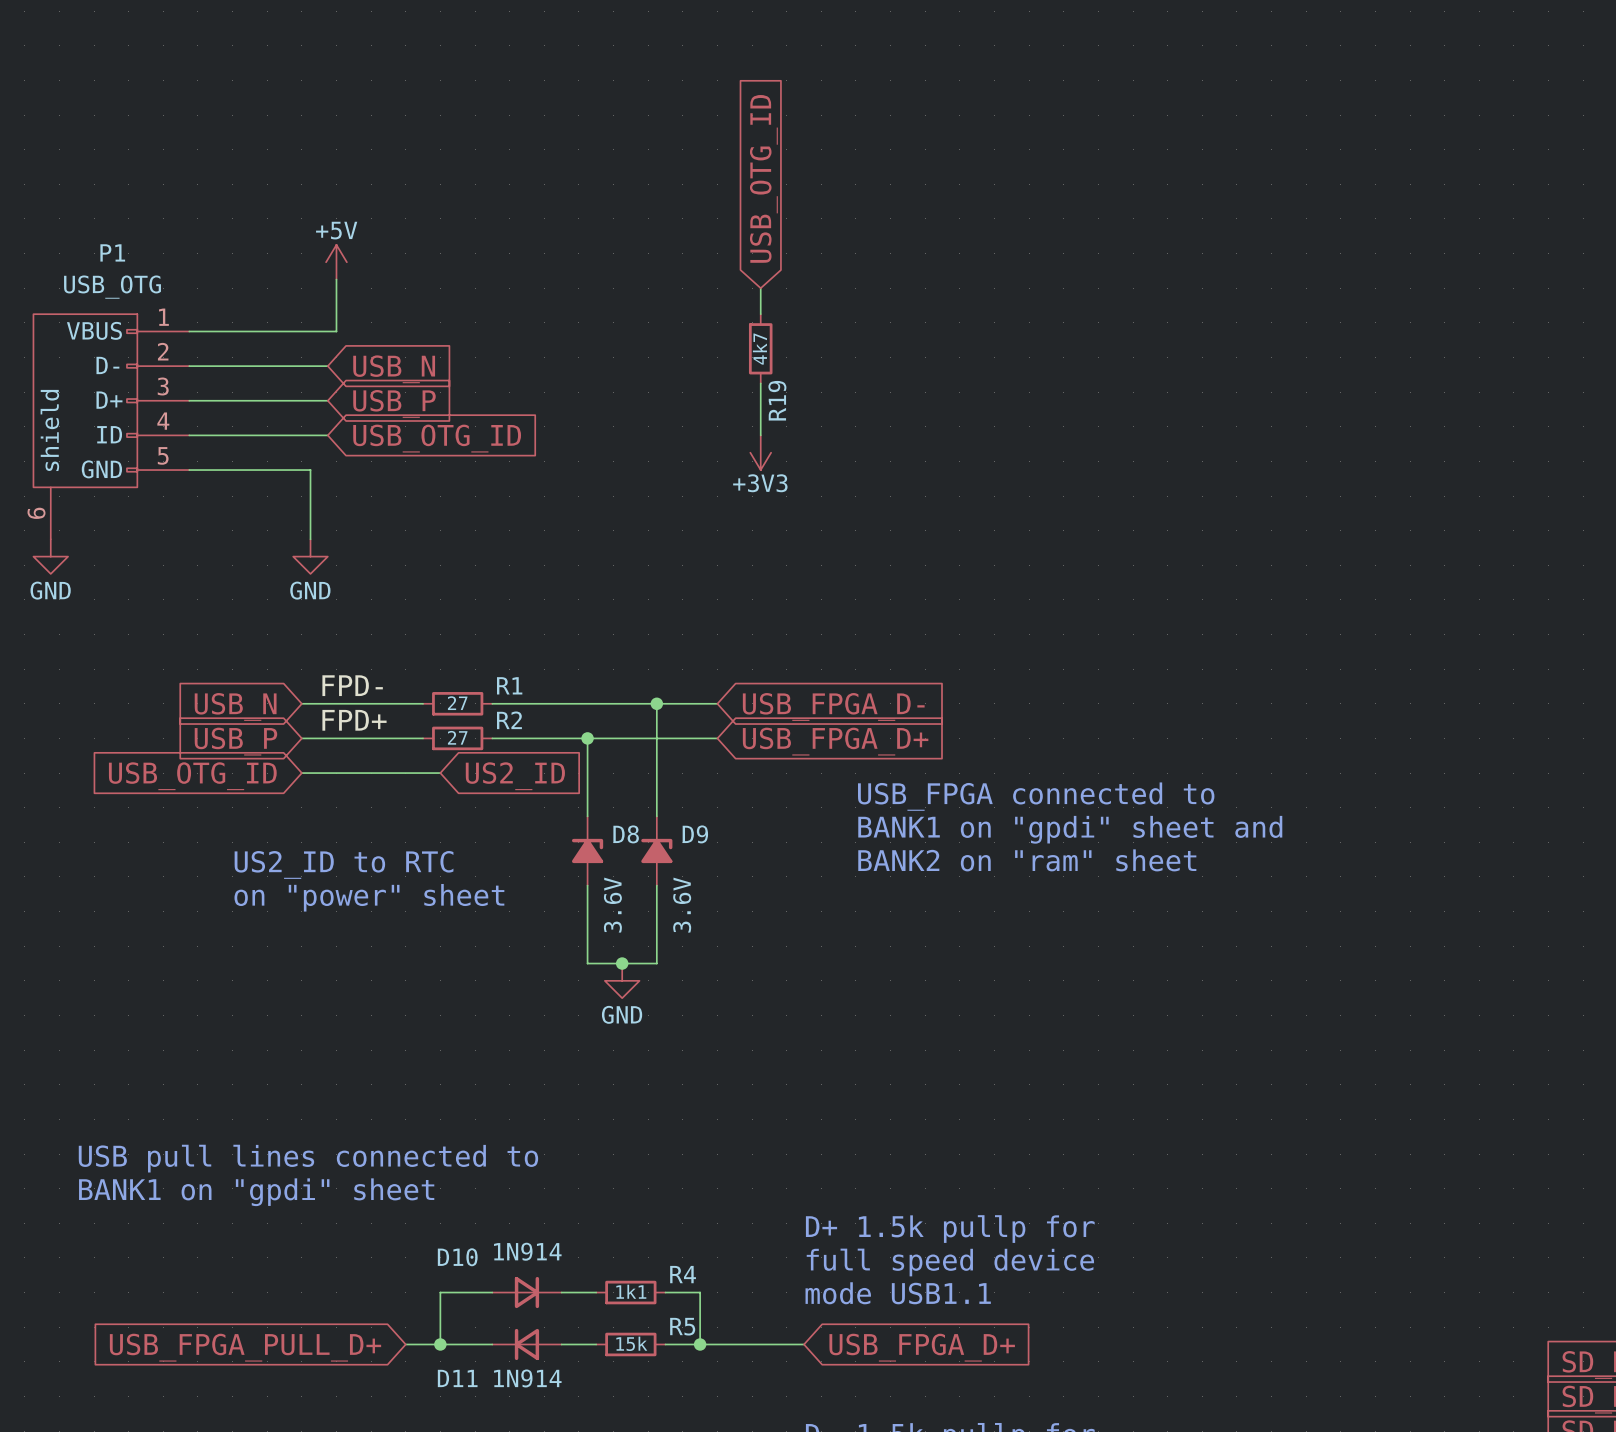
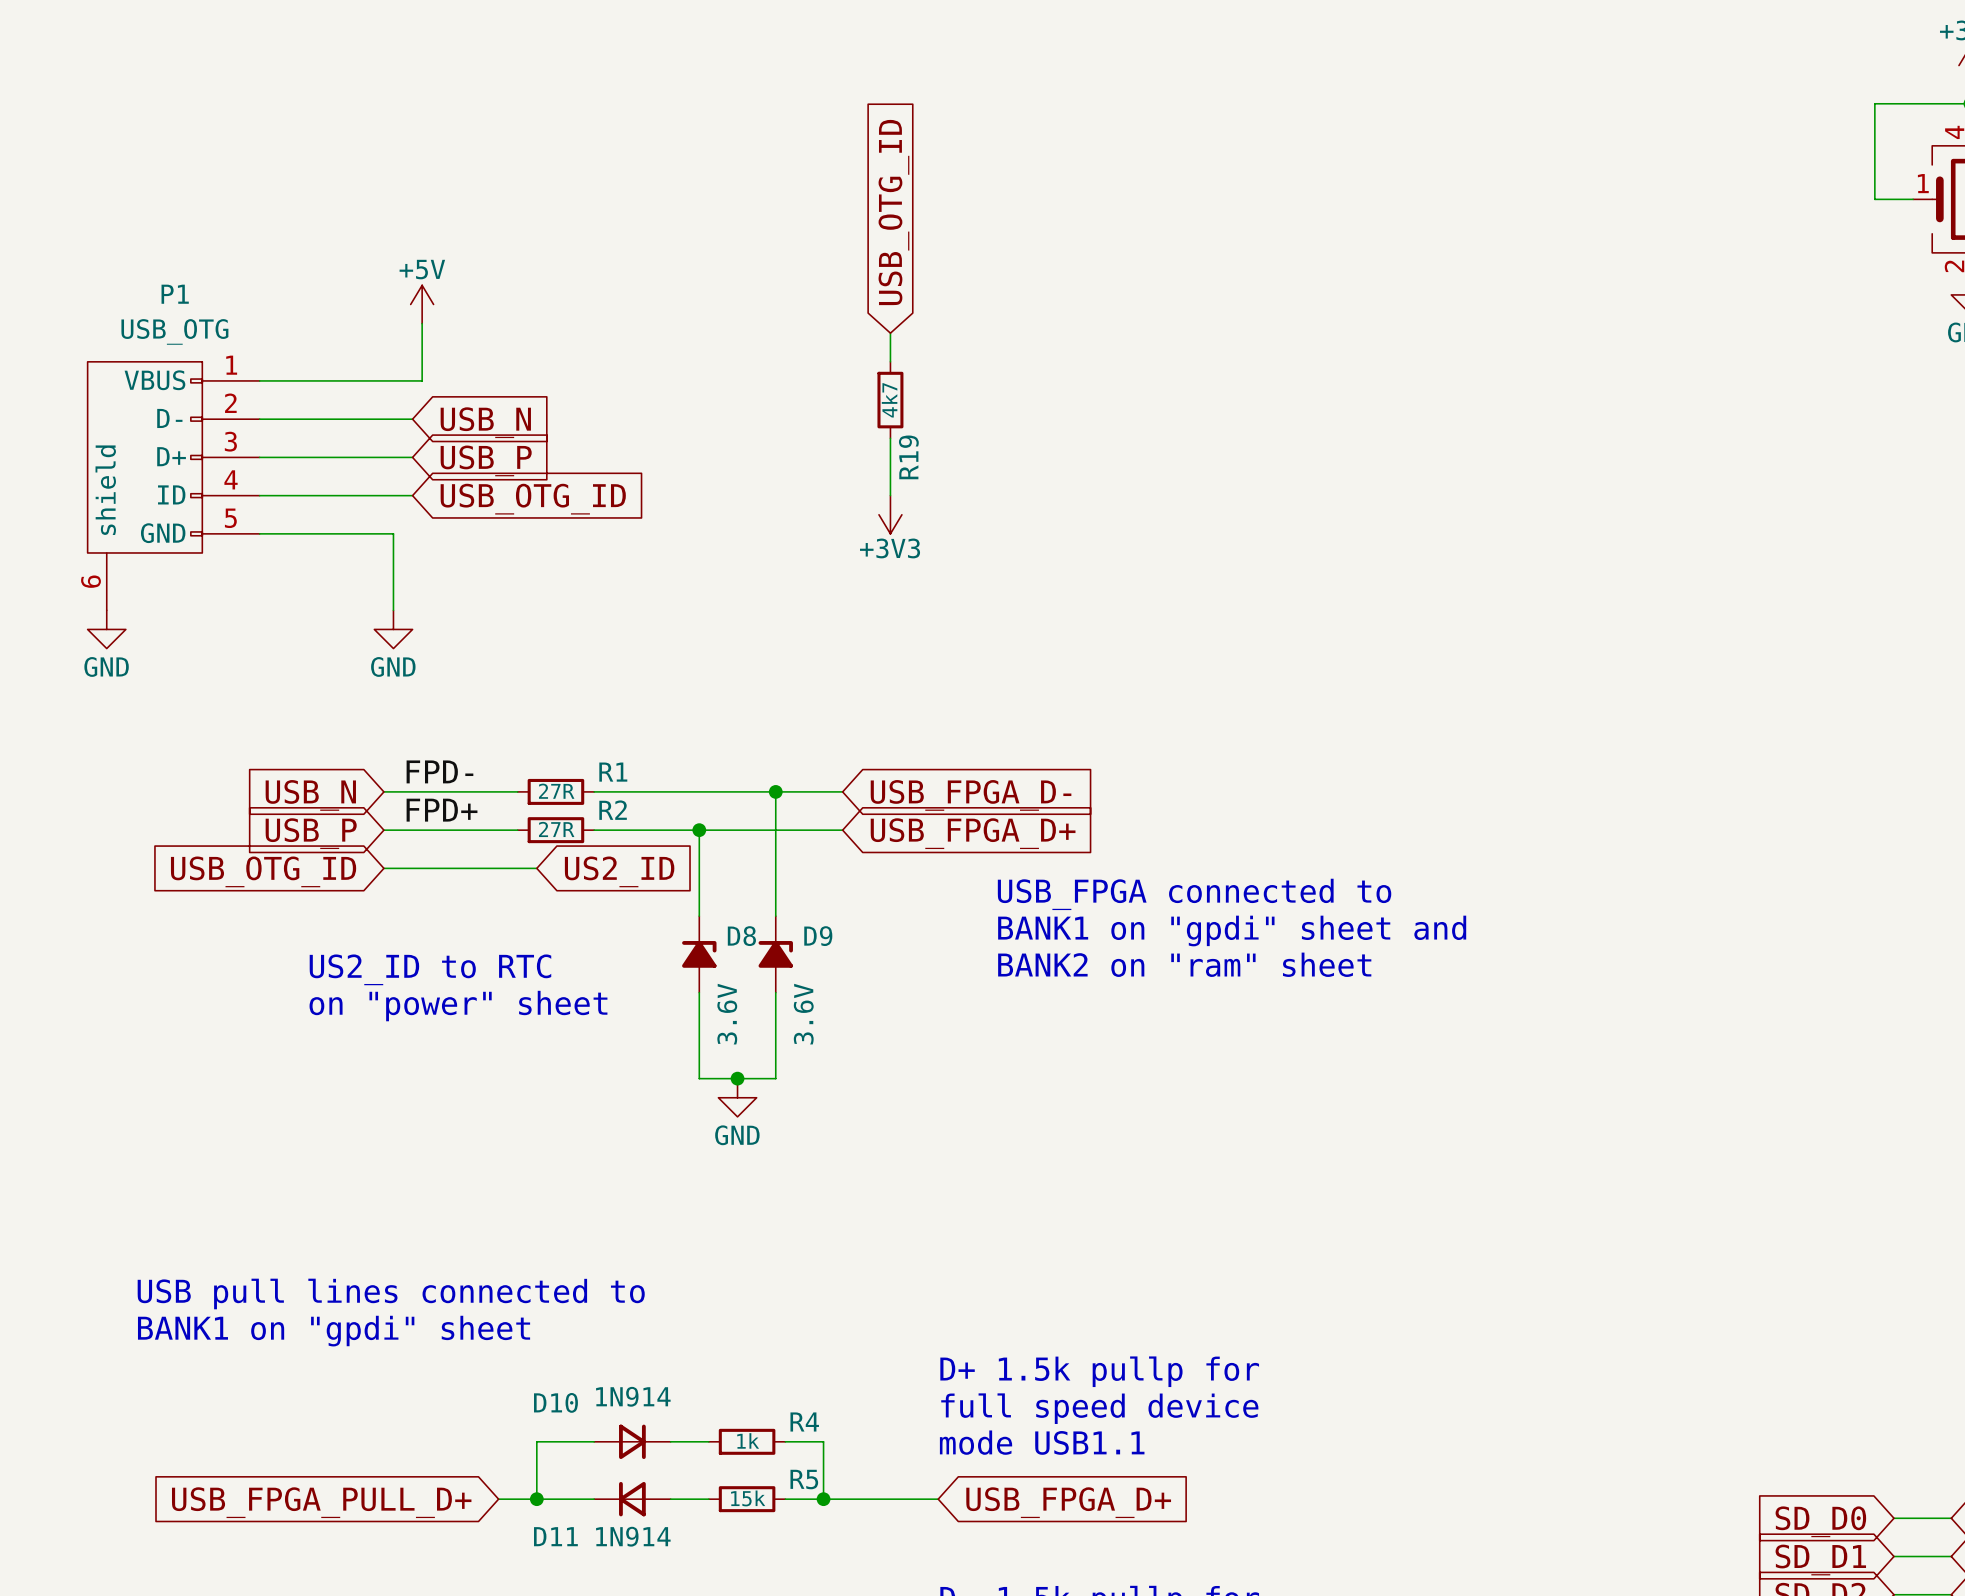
R1 value: 27 (457, 703) -> 27R (556, 791)
R2 value: 27 (457, 737) -> 27R (556, 829)
R4 value: 1k1 (631, 1291) -> 1k (748, 1440)

